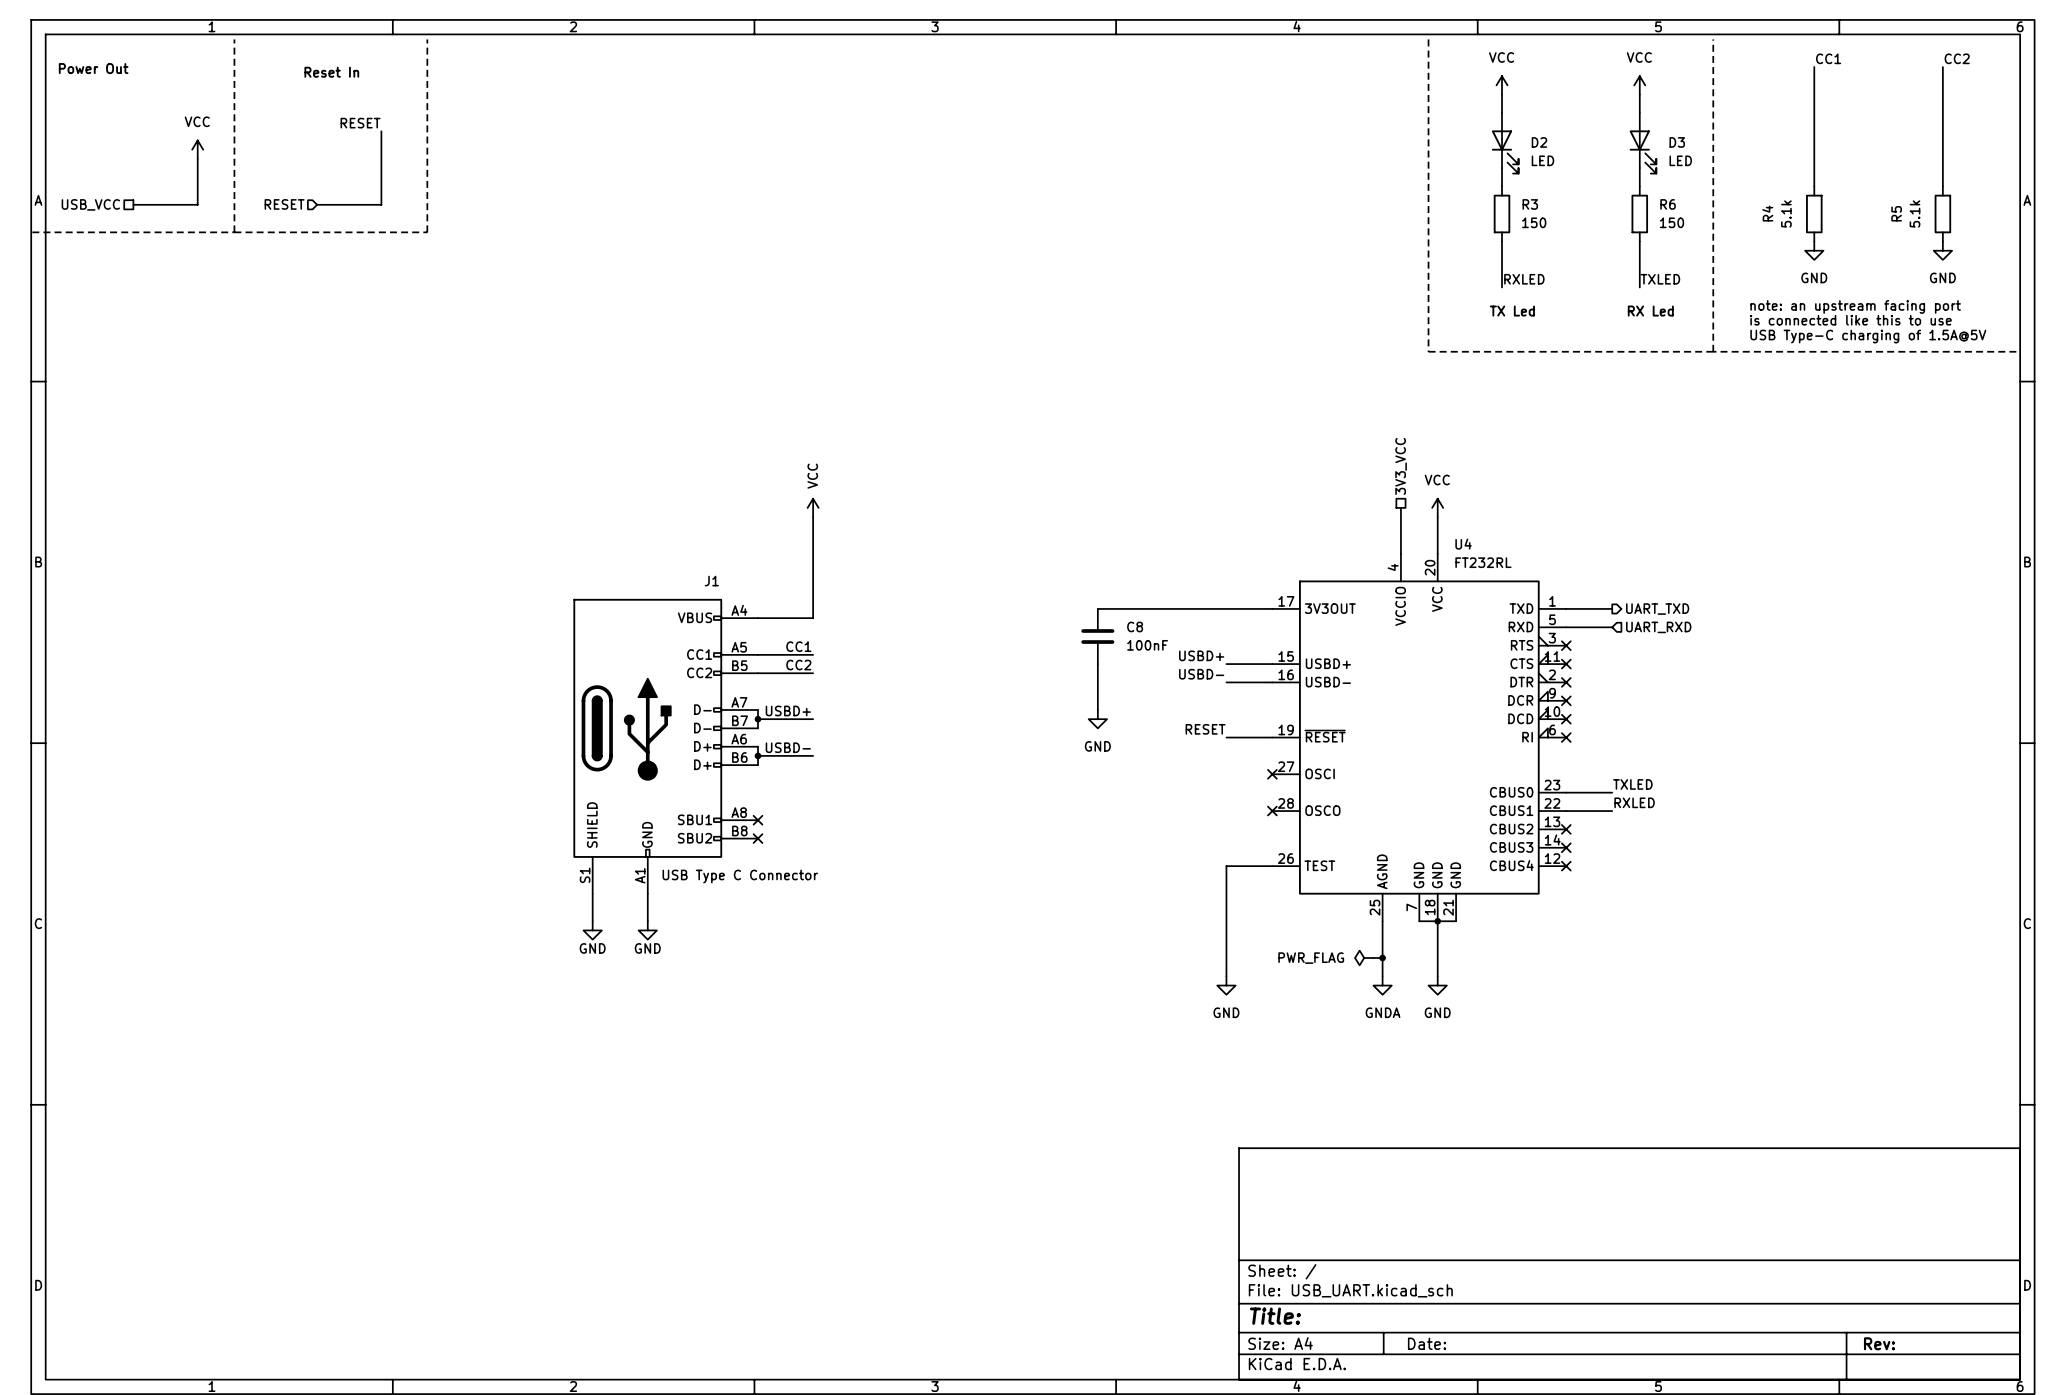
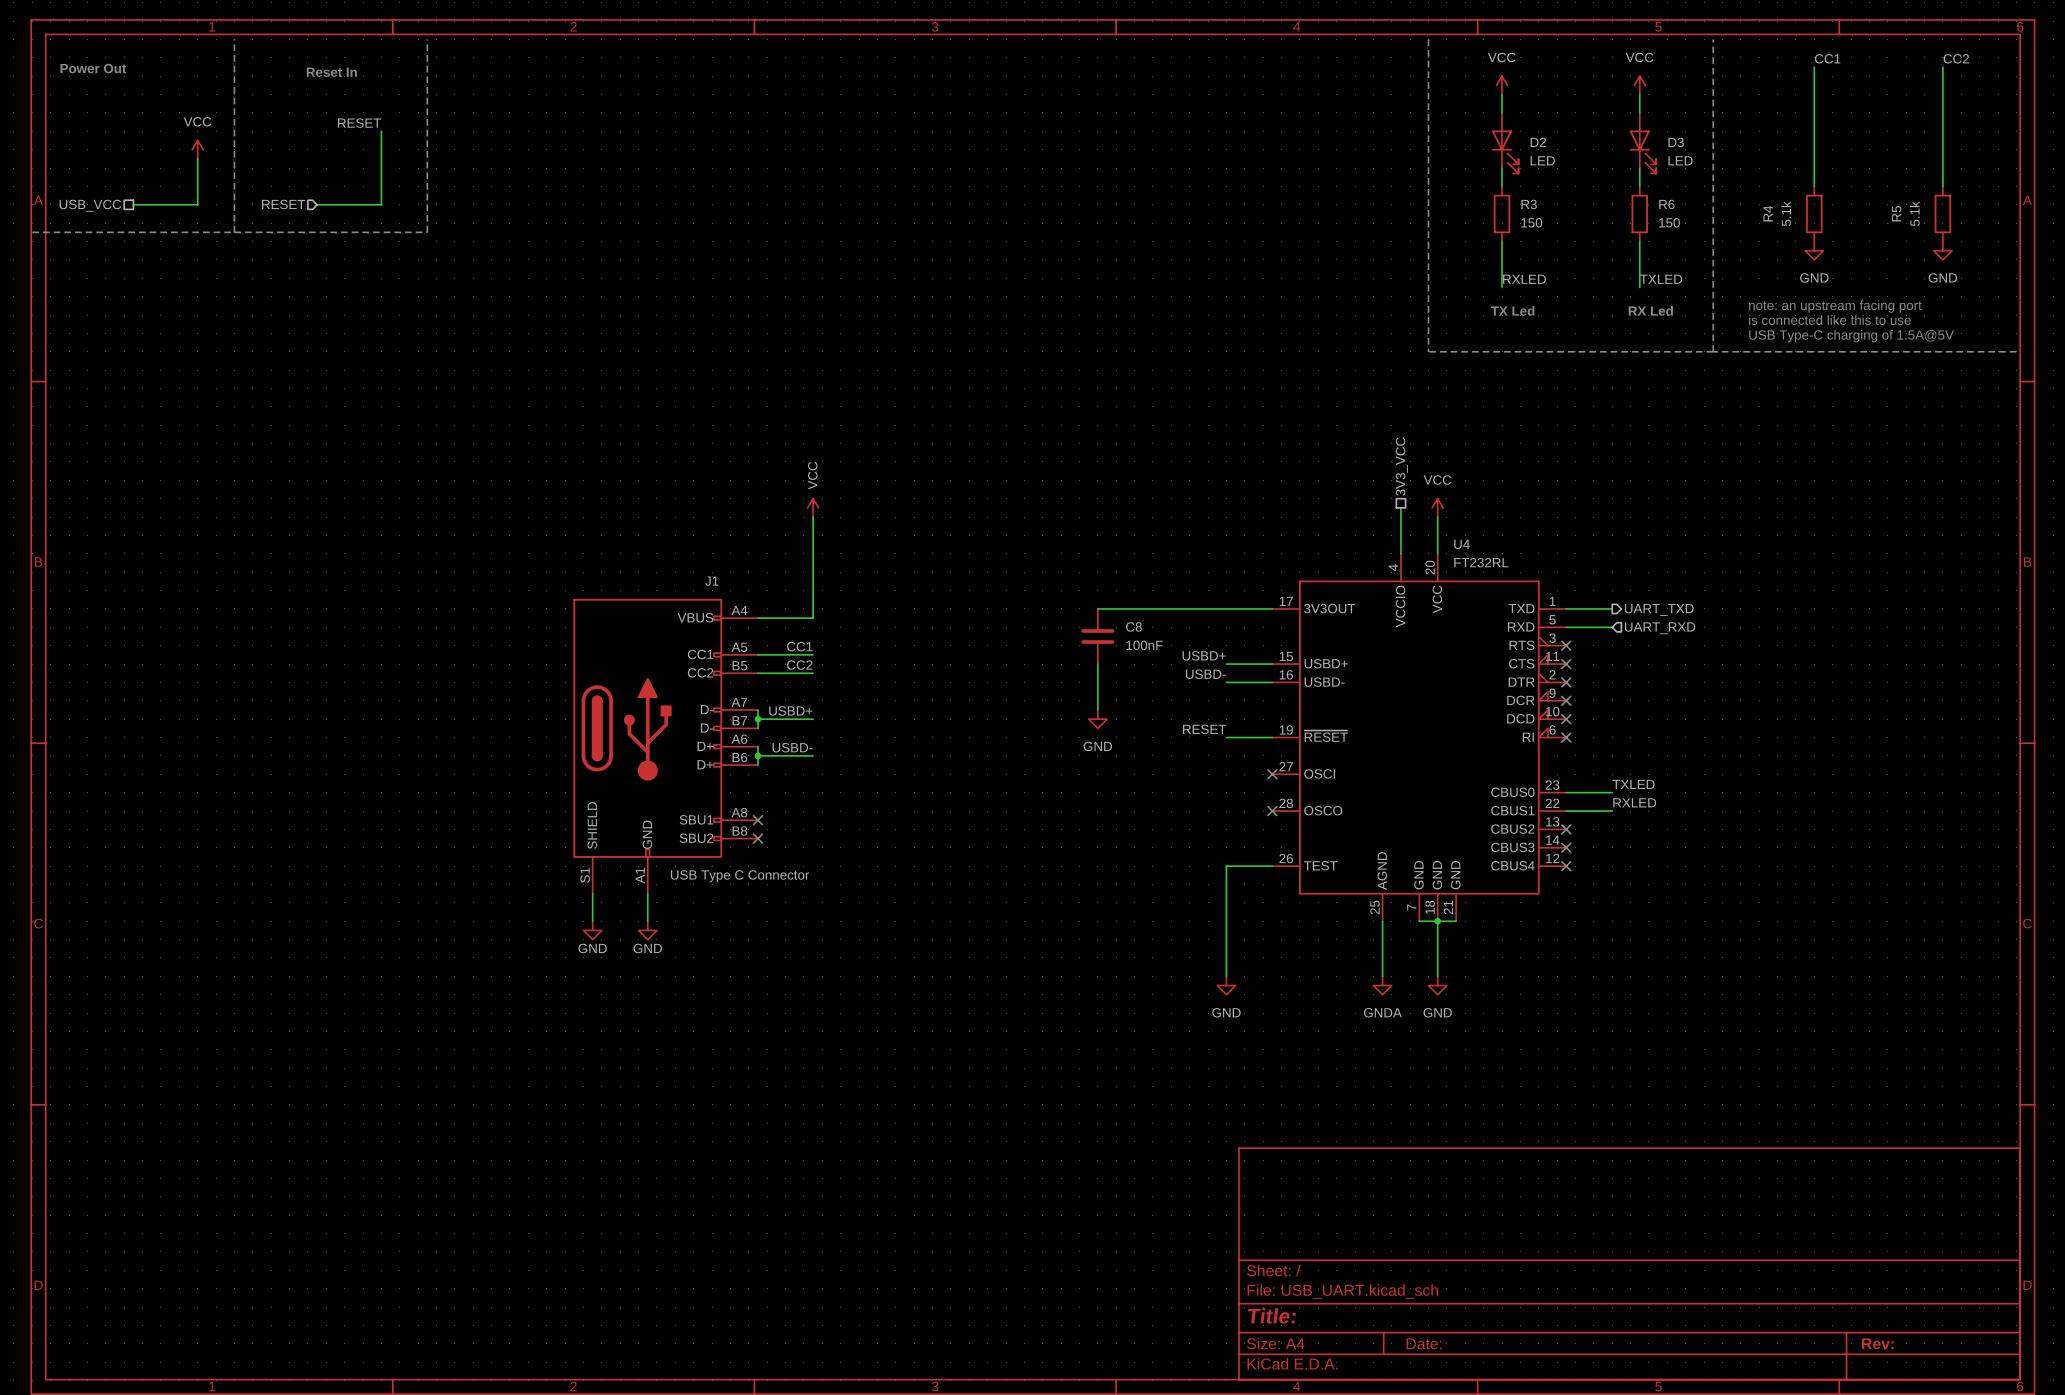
power symbol: PWR_FLAG (1364, 957) -> none
wire: (1373, 957) (1382, 957) -> none
junction: (1382, 957) -> none

